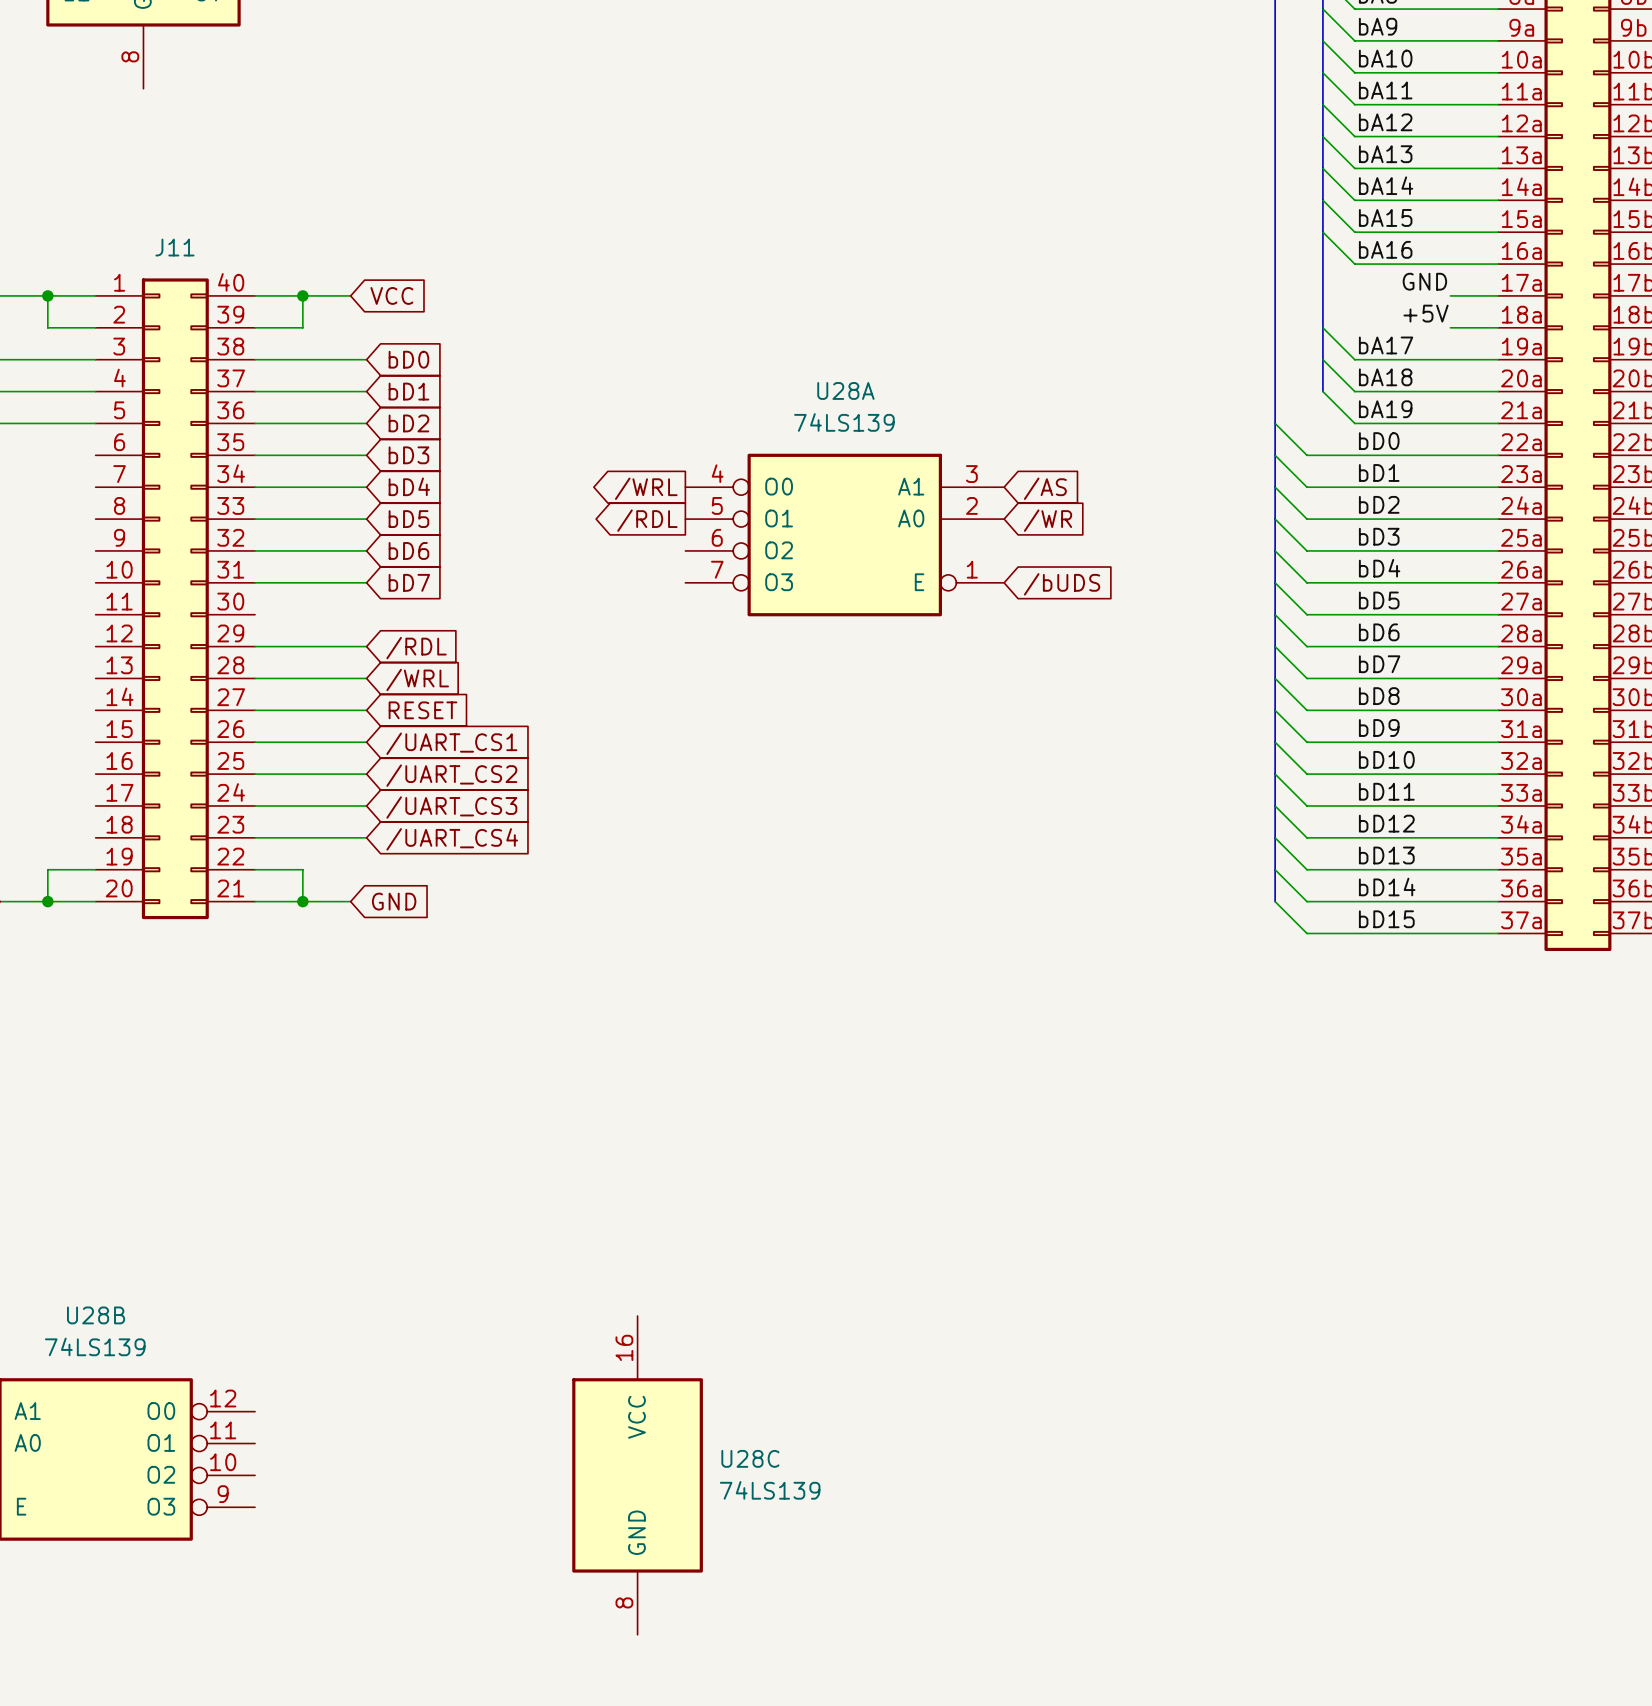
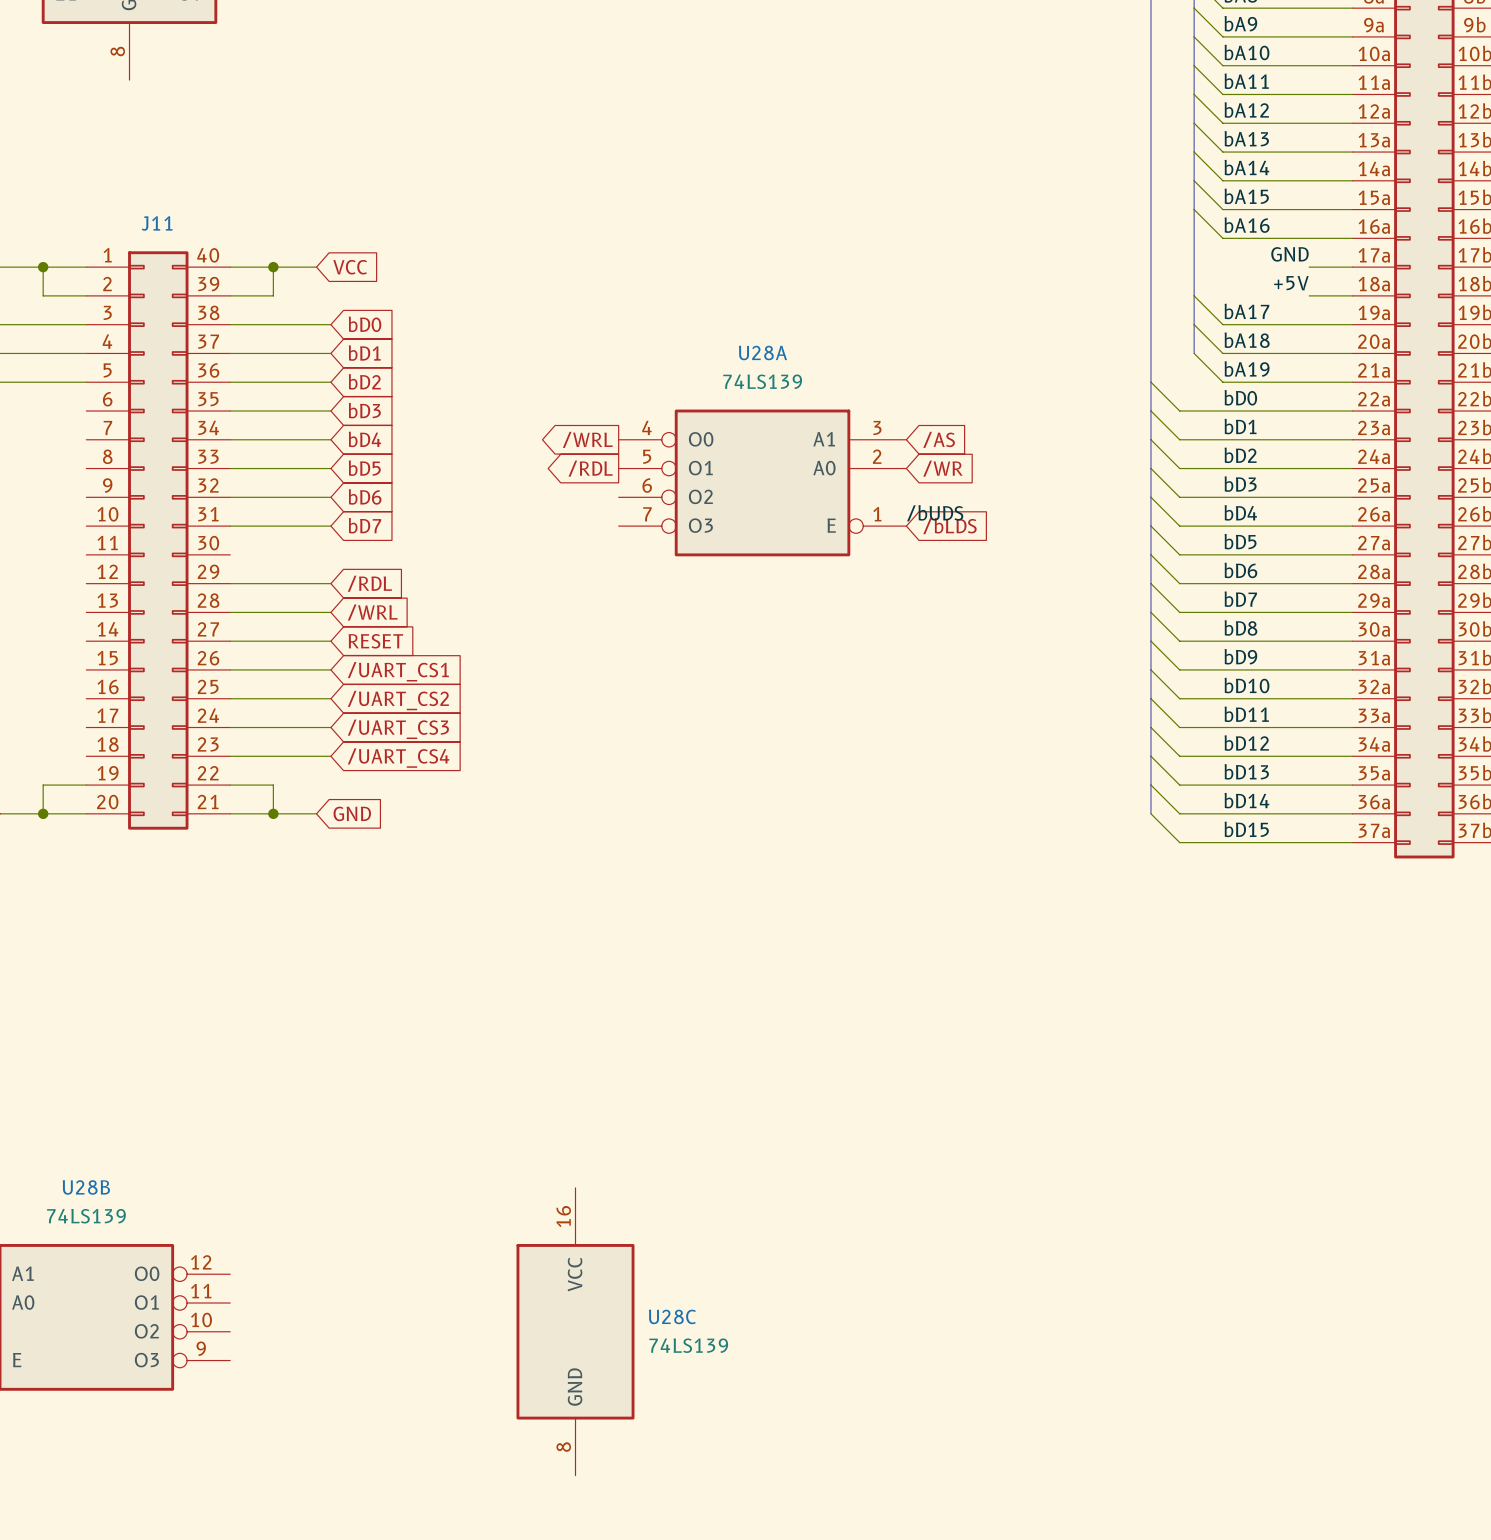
label: none -> /bUDS (935, 513)
global label: /bUDS (1062, 584) -> /bLDS (949, 526)

